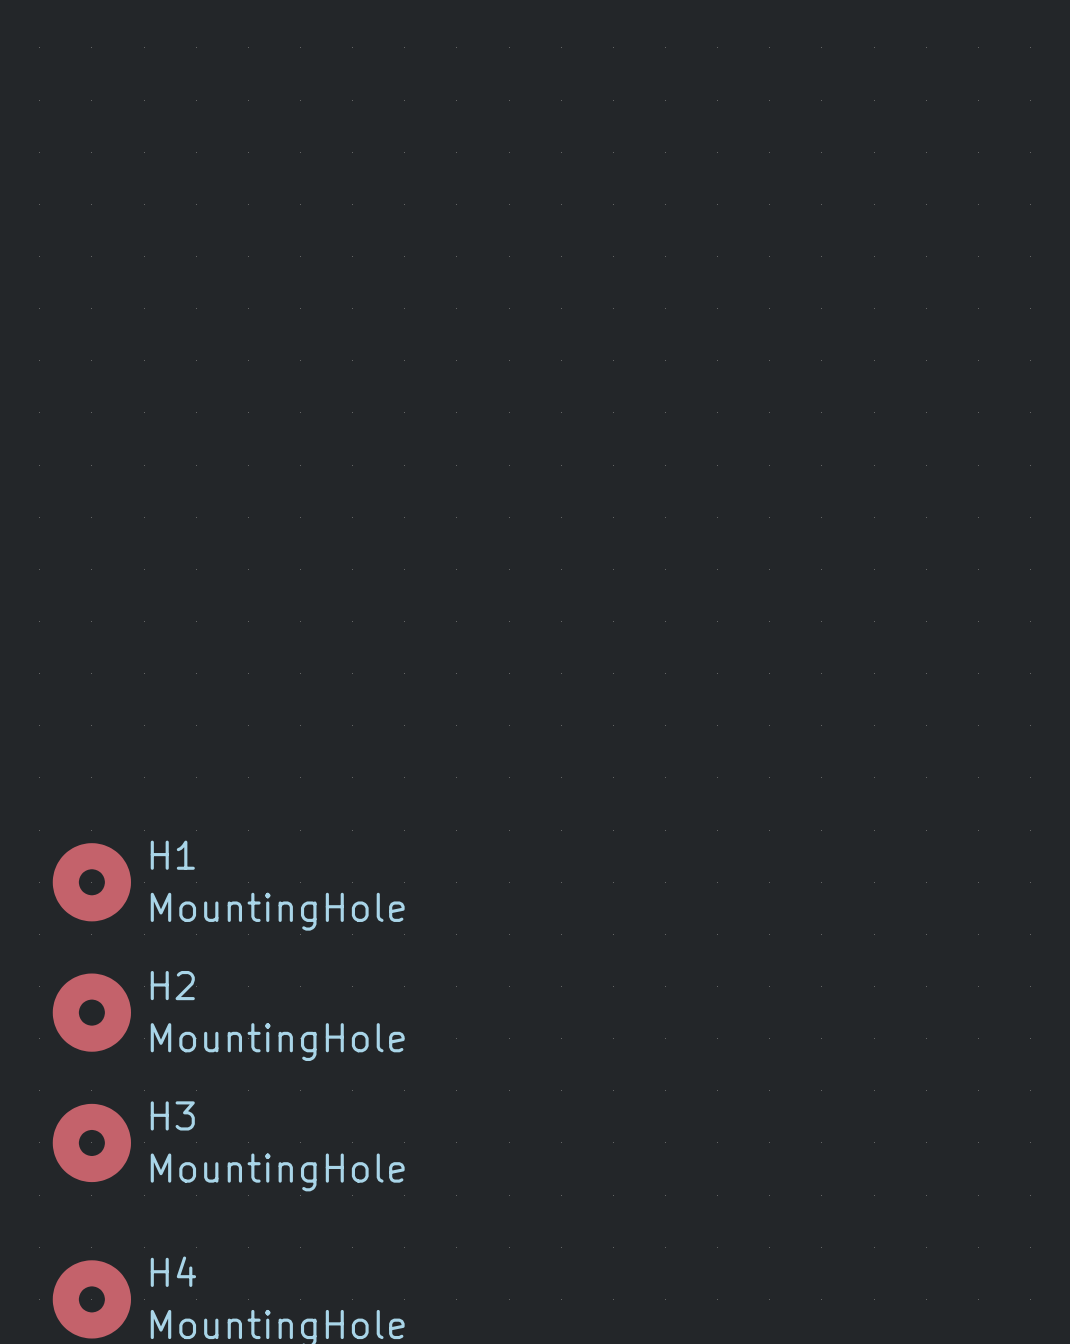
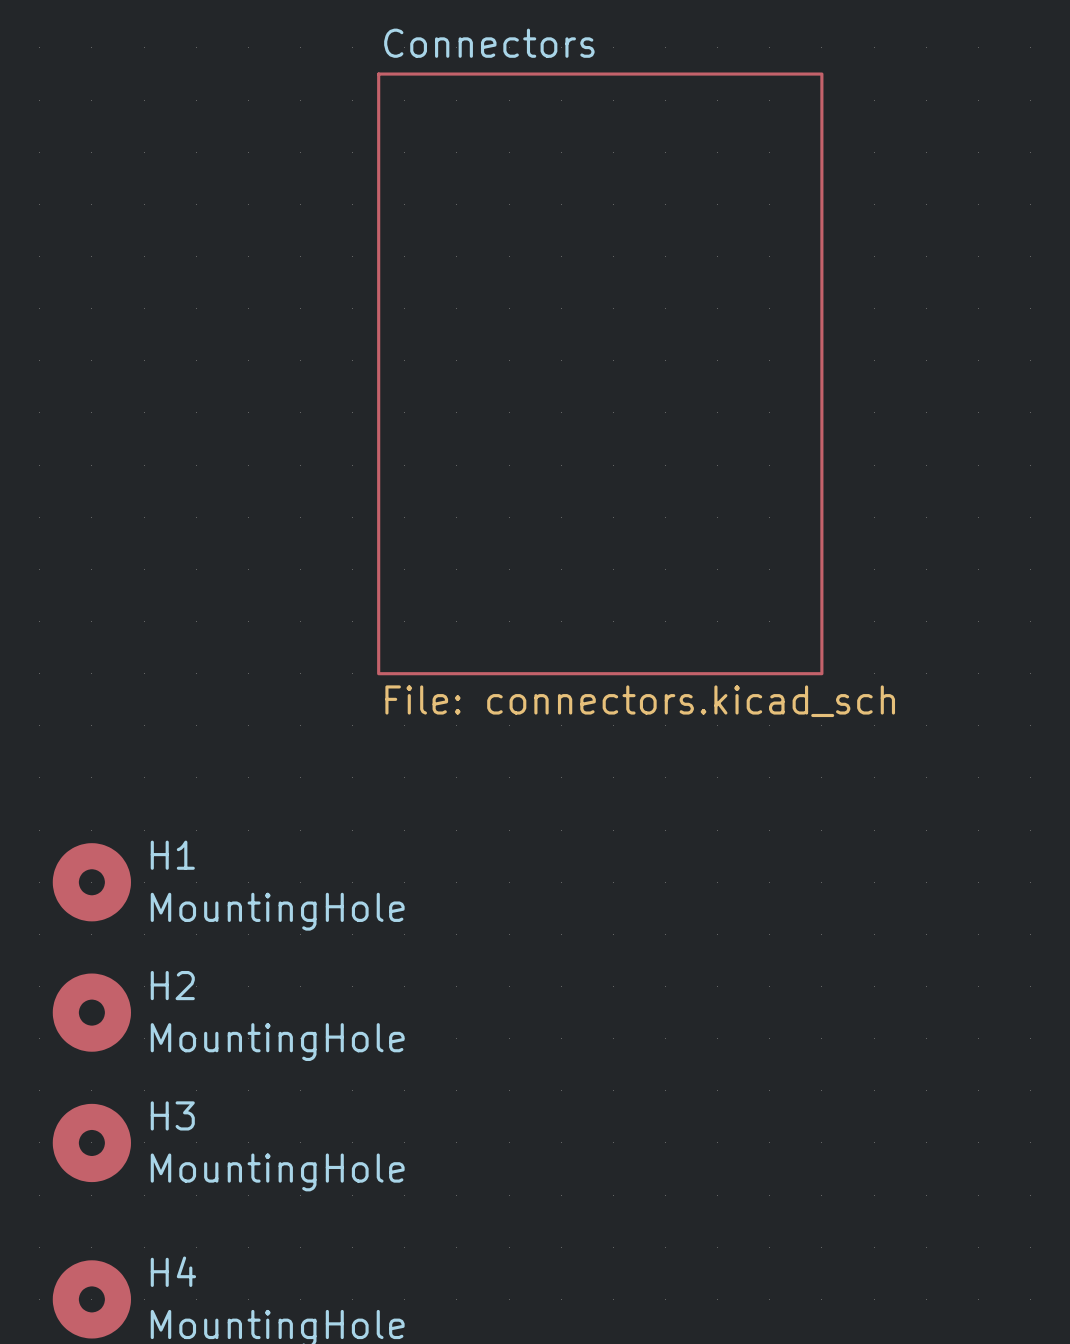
sheet Connectors: none -> File: connectors.kicad_sch (600, 373)

